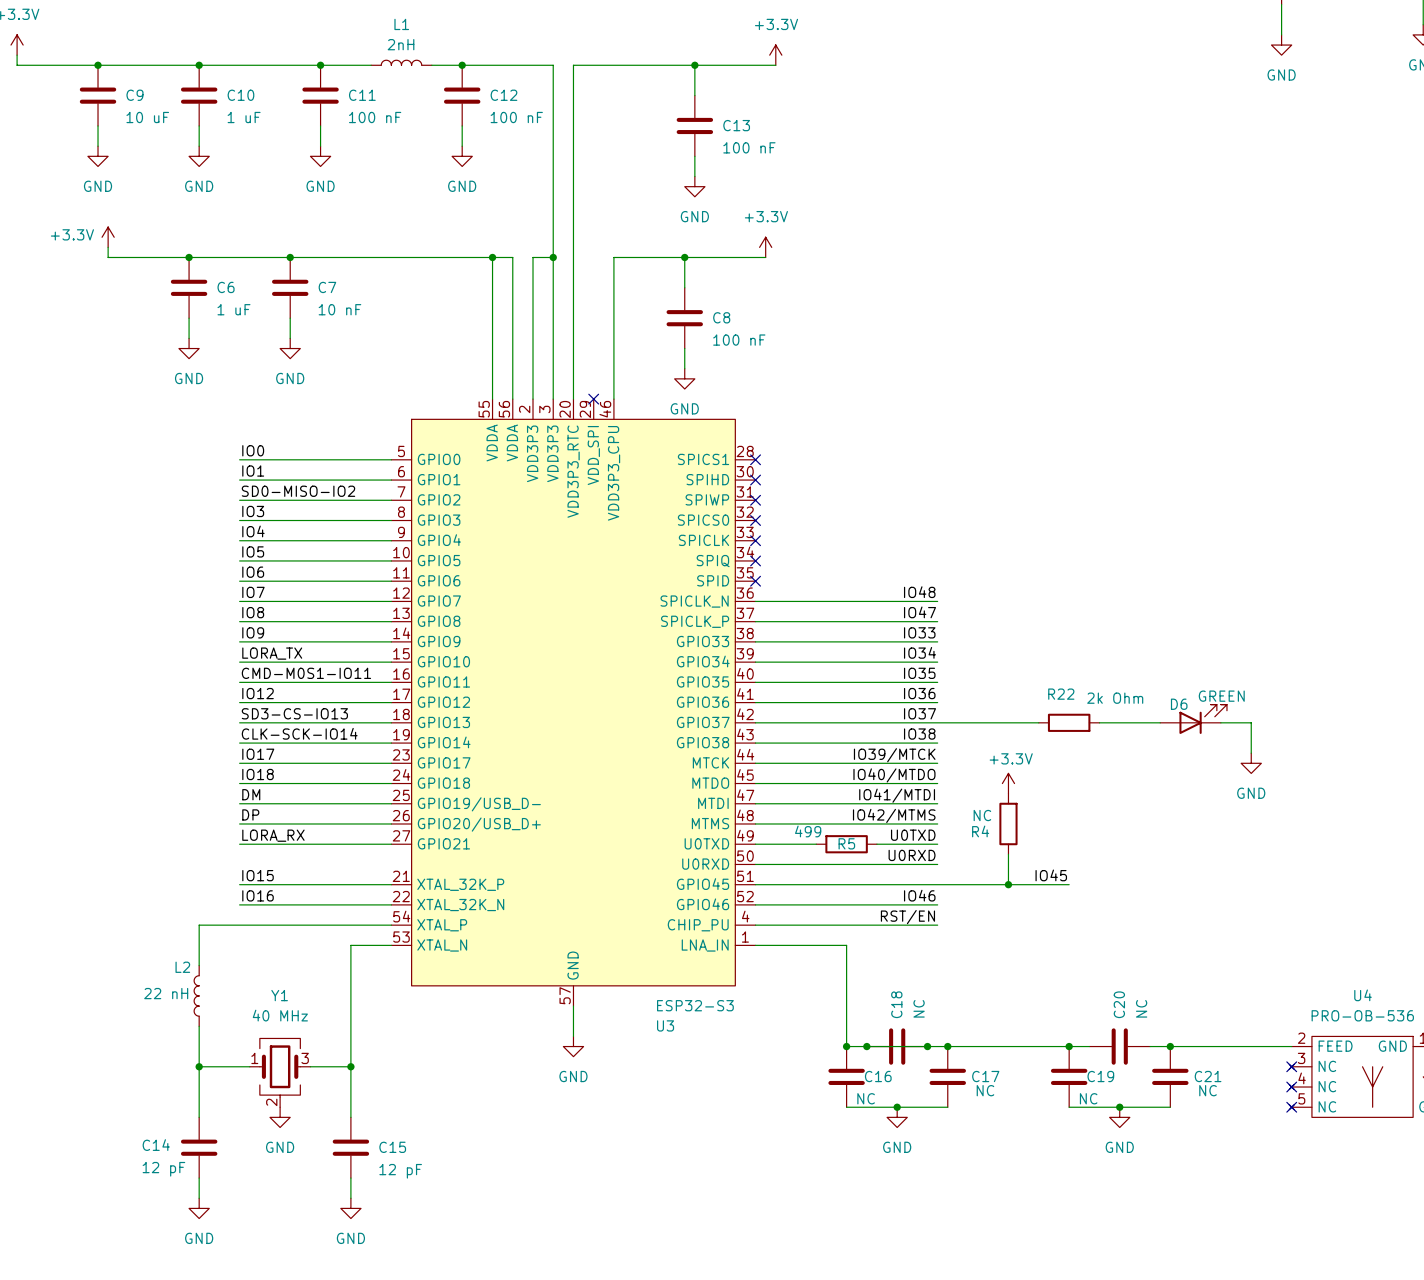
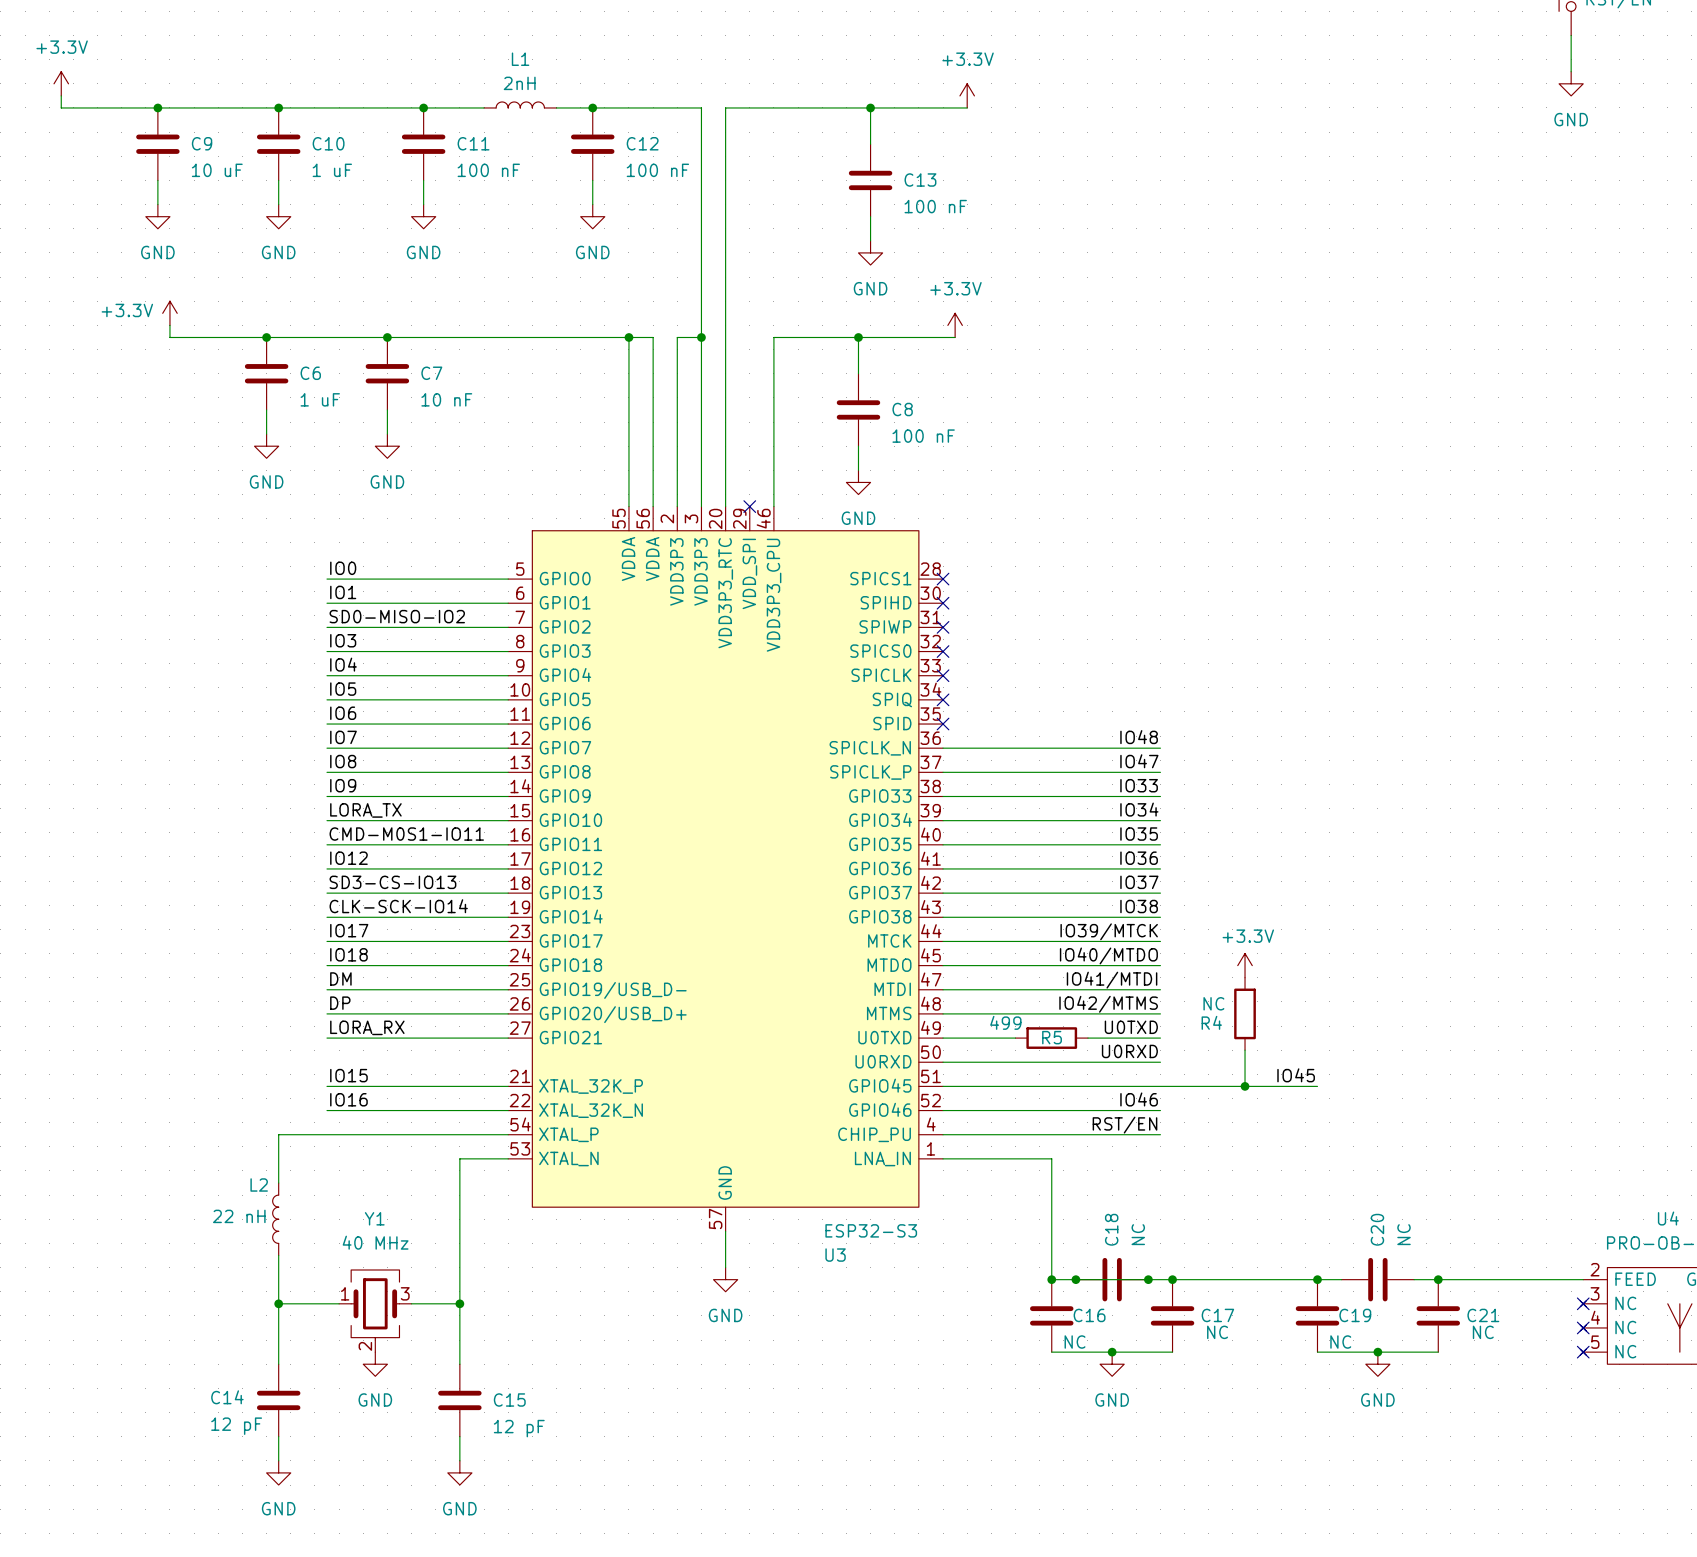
D6: GREEN (1193, 719) -> none
wire: (937, 722) (1038, 722) -> none
R22: 2k Ohm (1069, 722) -> none
wire: (1099, 722) (1160, 722) -> none
wire: (1220, 722) (1251, 722) (1251, 753) -> none
power symbol: GND (1251, 763) -> none

